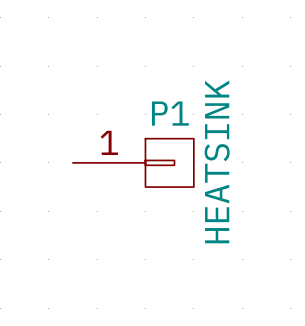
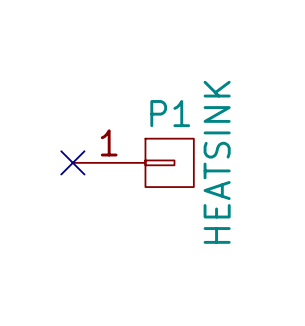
no-connect mark: none -> (72, 162)

